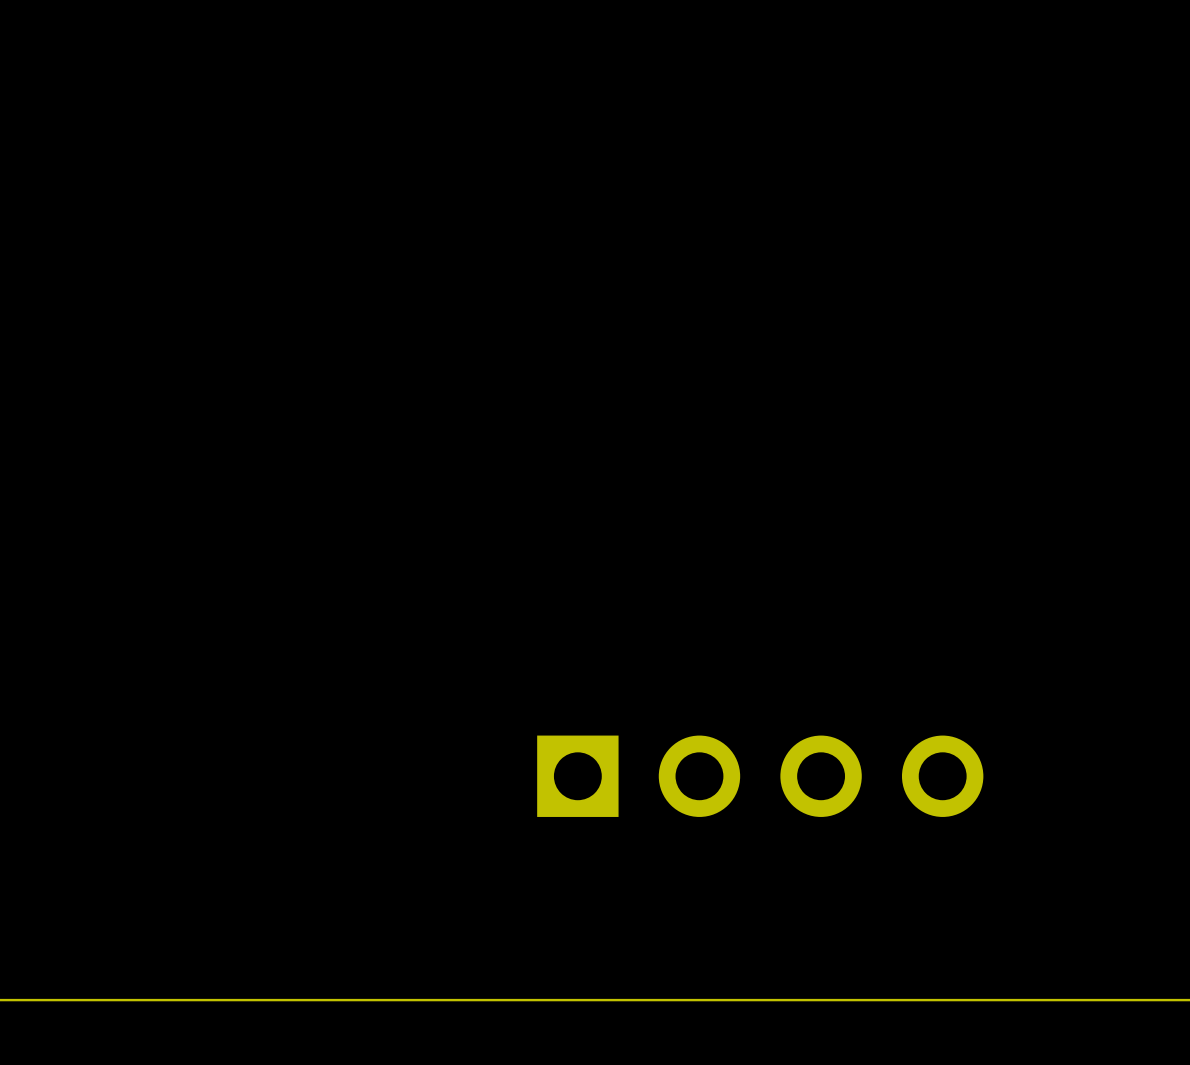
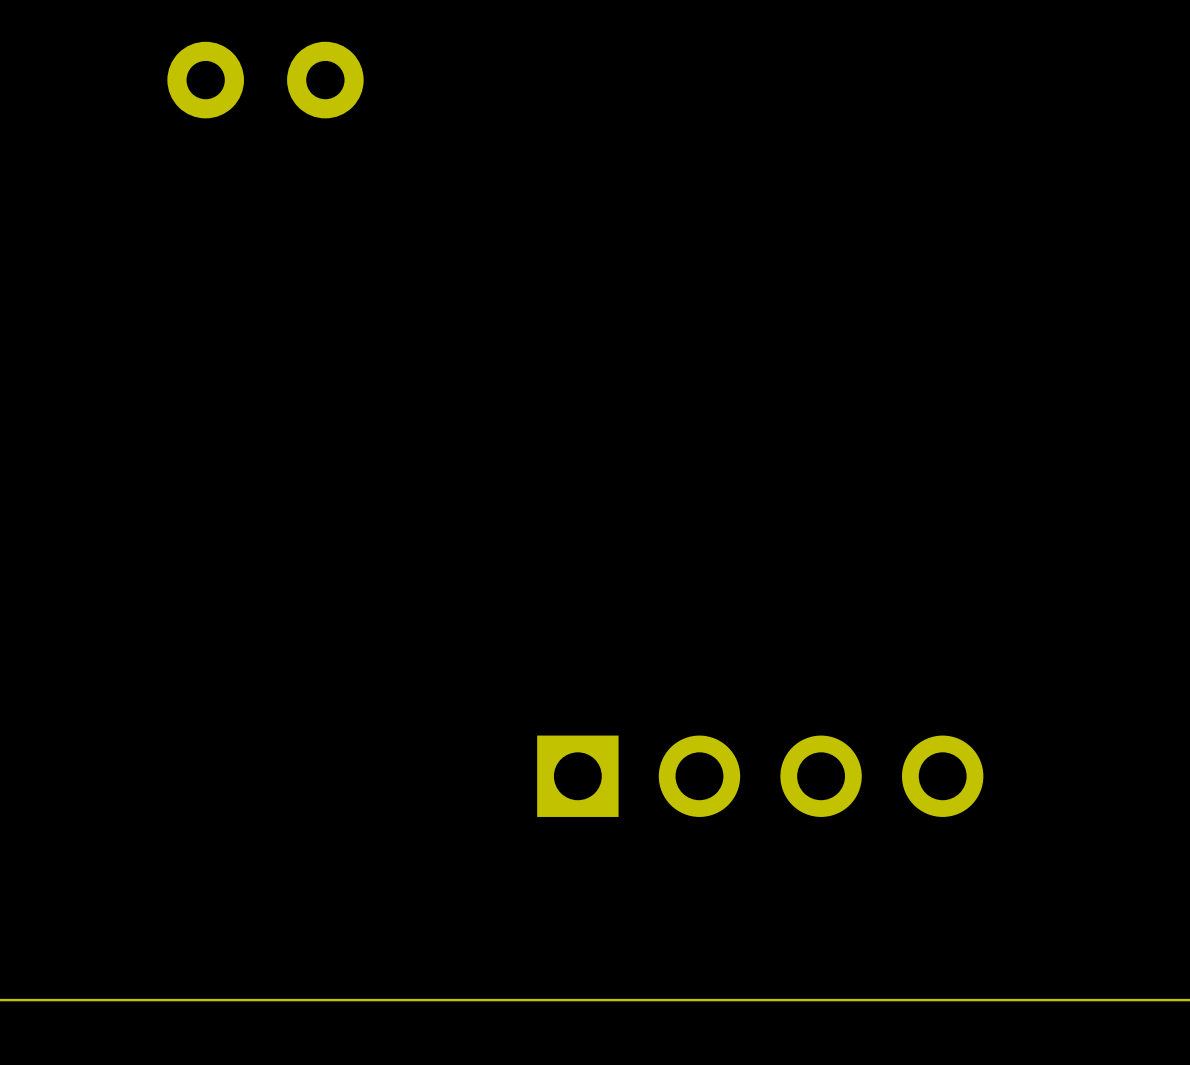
part: none -> (265, 80)

